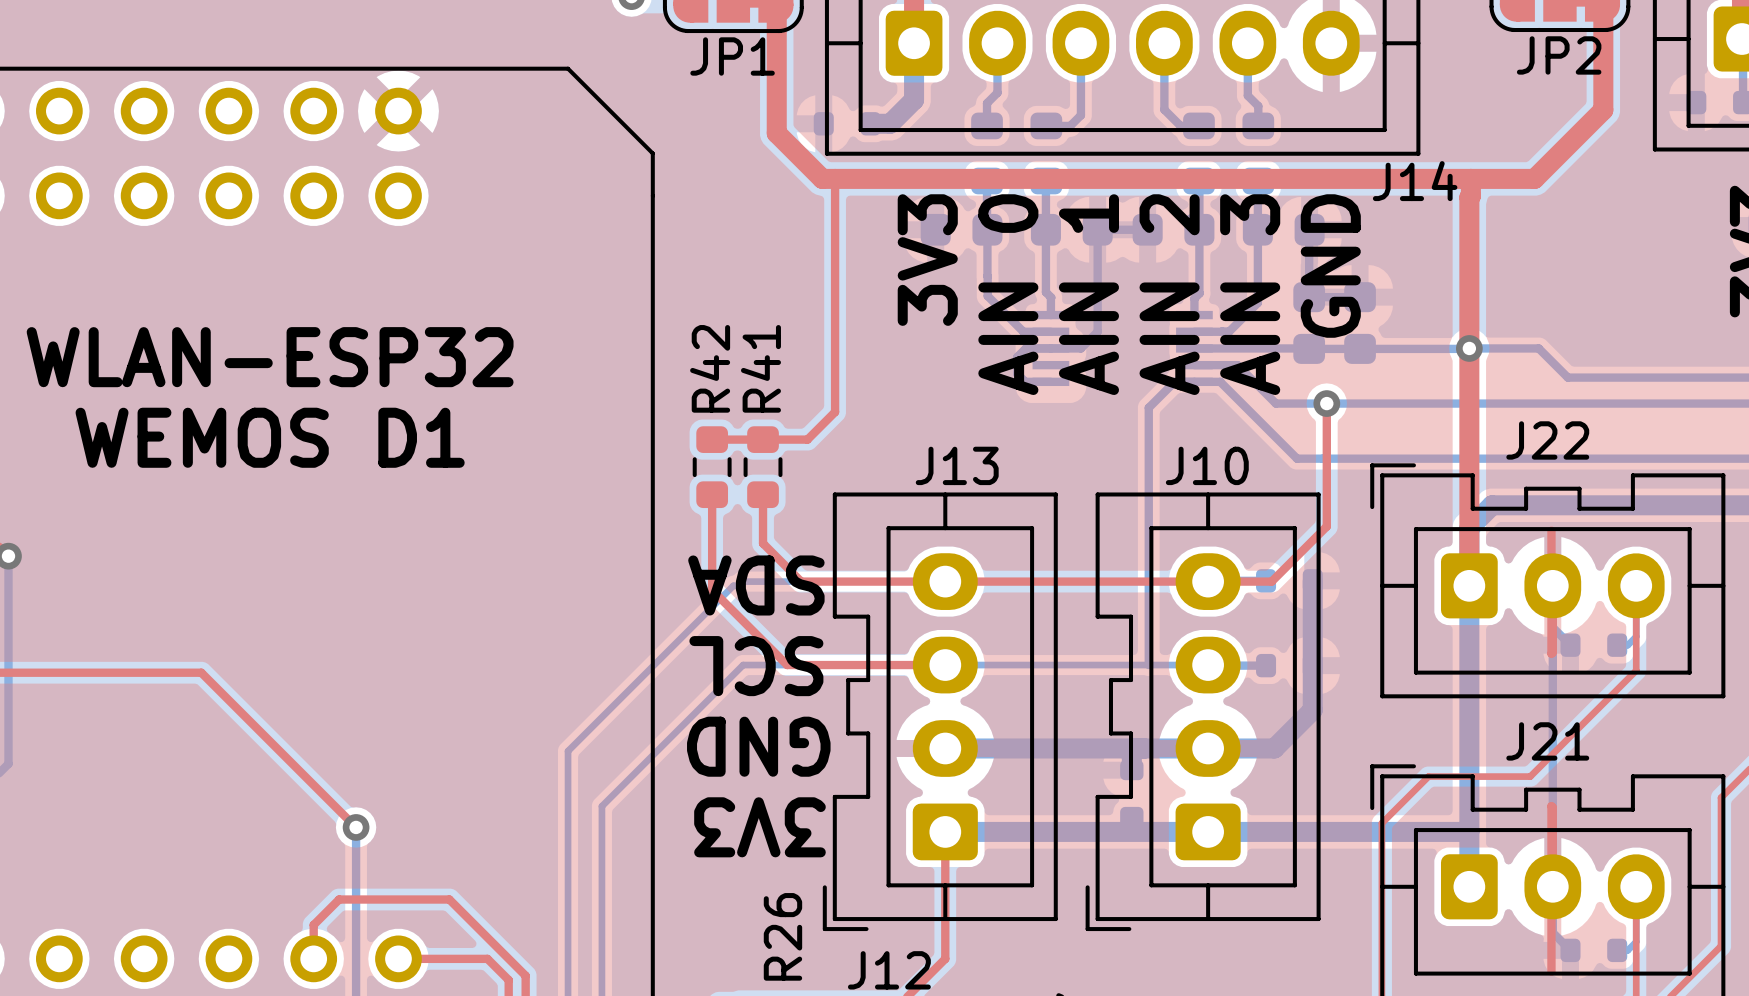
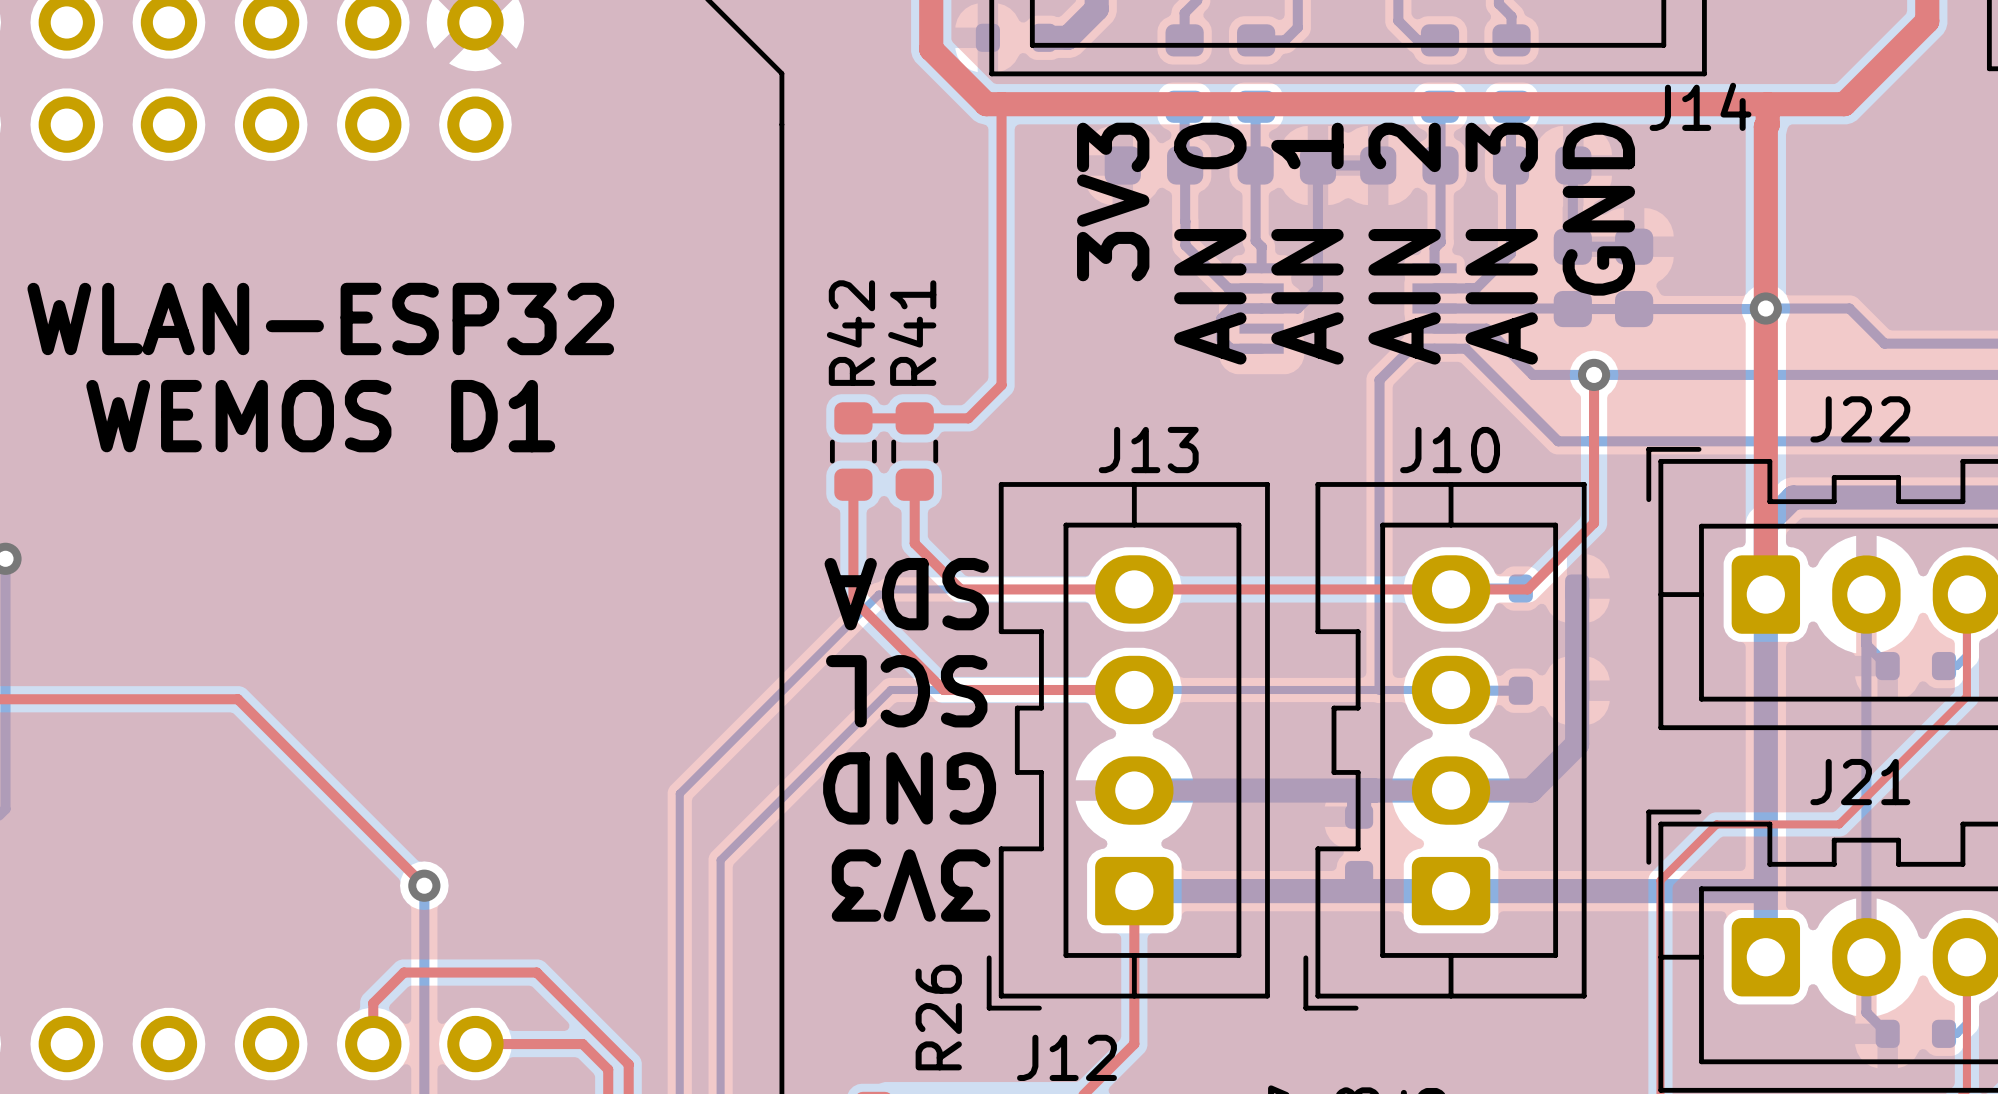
top track: (1551, 530) (1551, 653) (1552, 585) -> none
top track: (1552, 886) (1551, 806) (1551, 971) -> none

